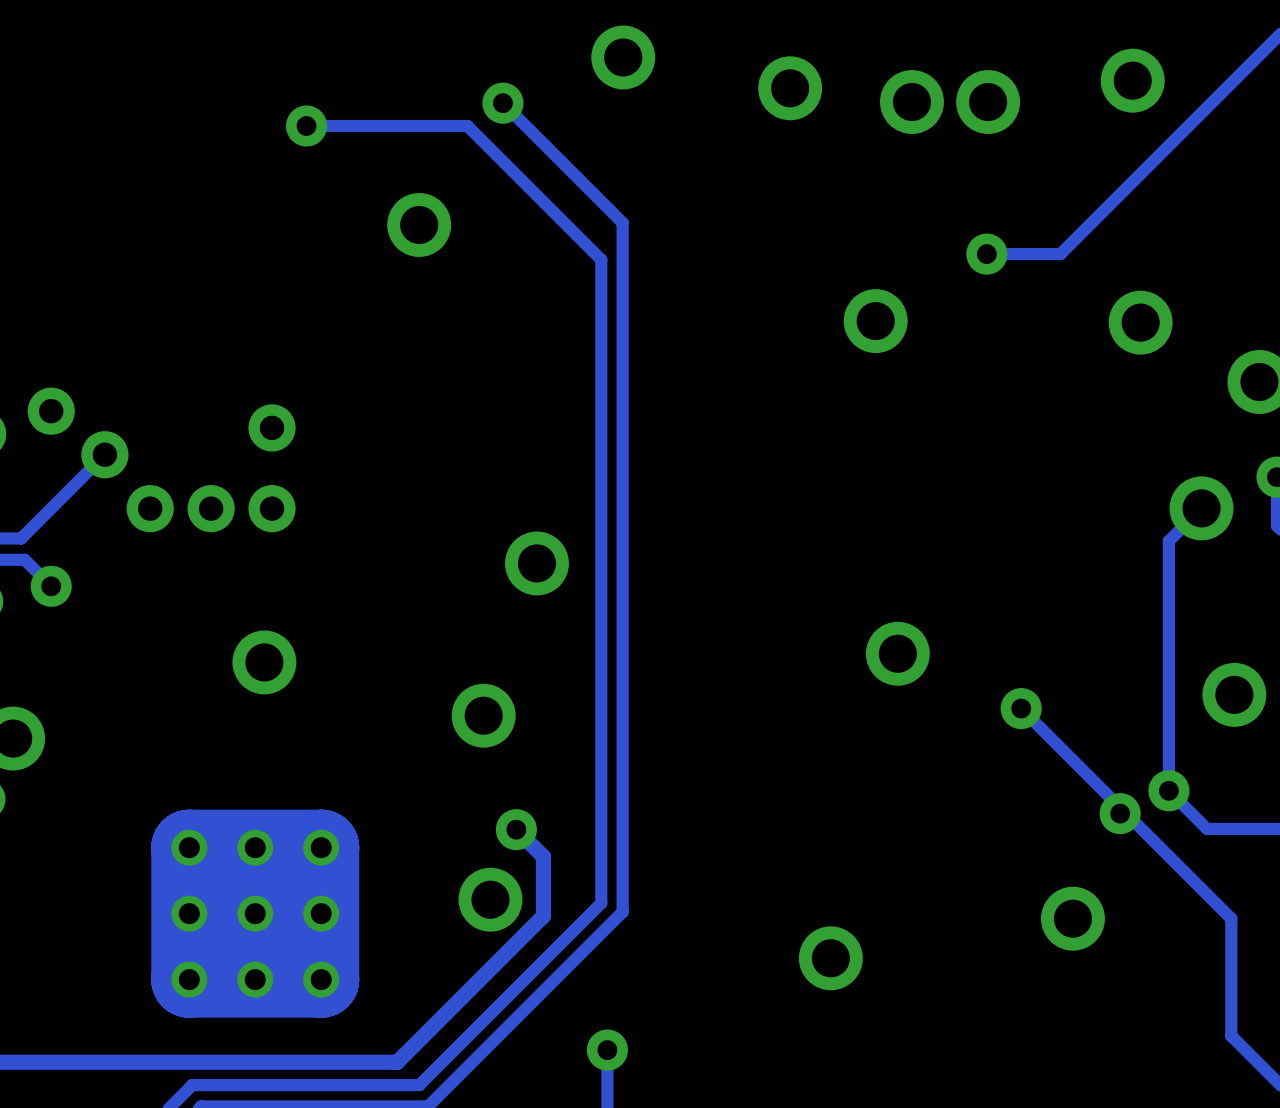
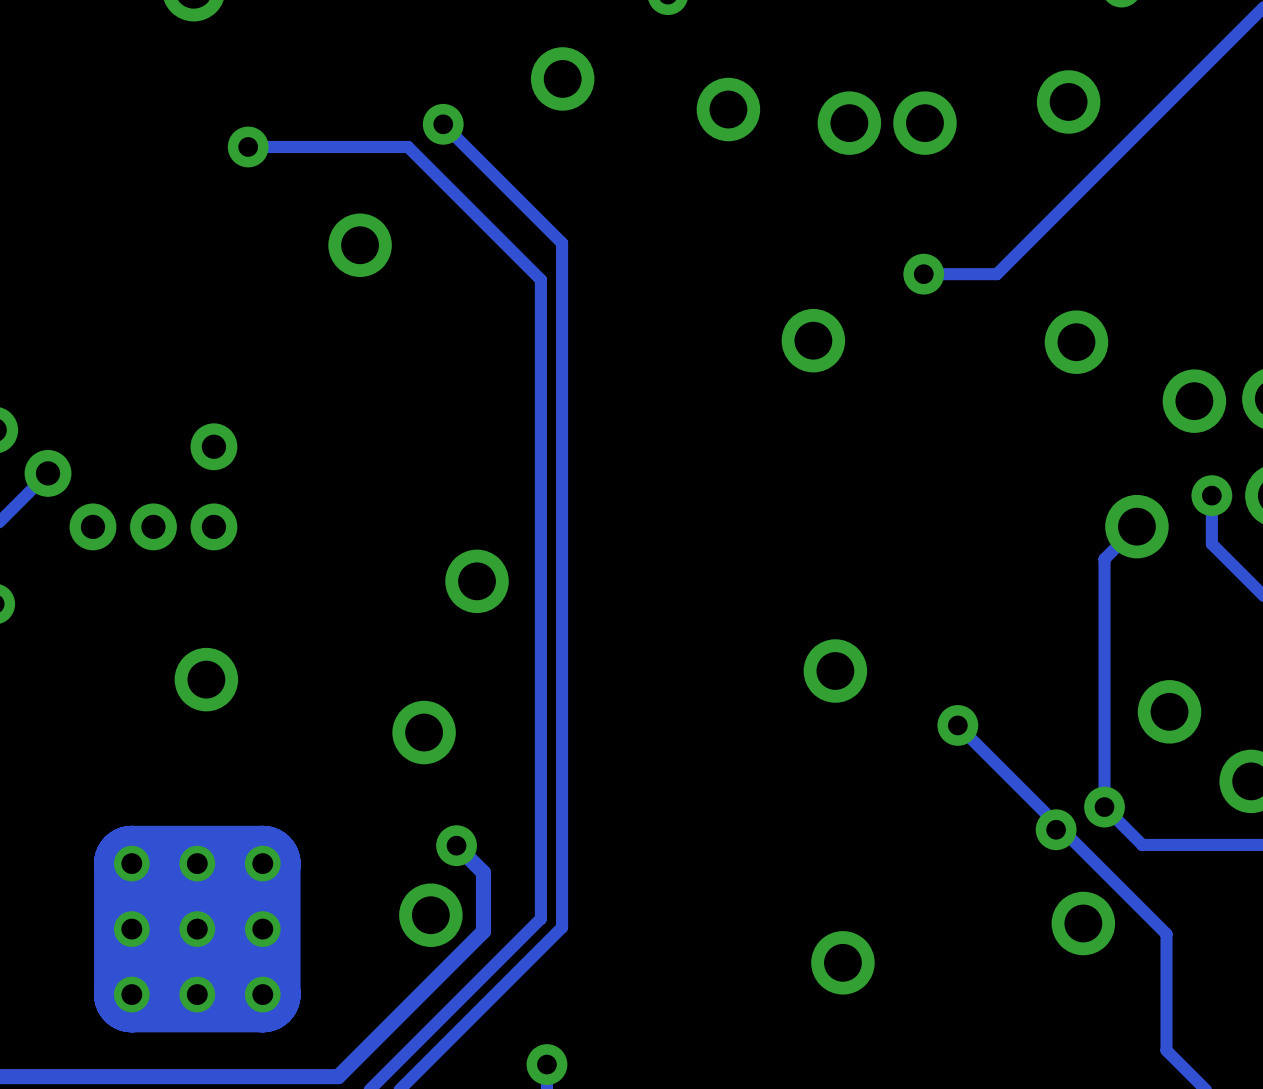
via position: (1072, 918) -> (1083, 923)
via position: (830, 958) -> (842, 962)

